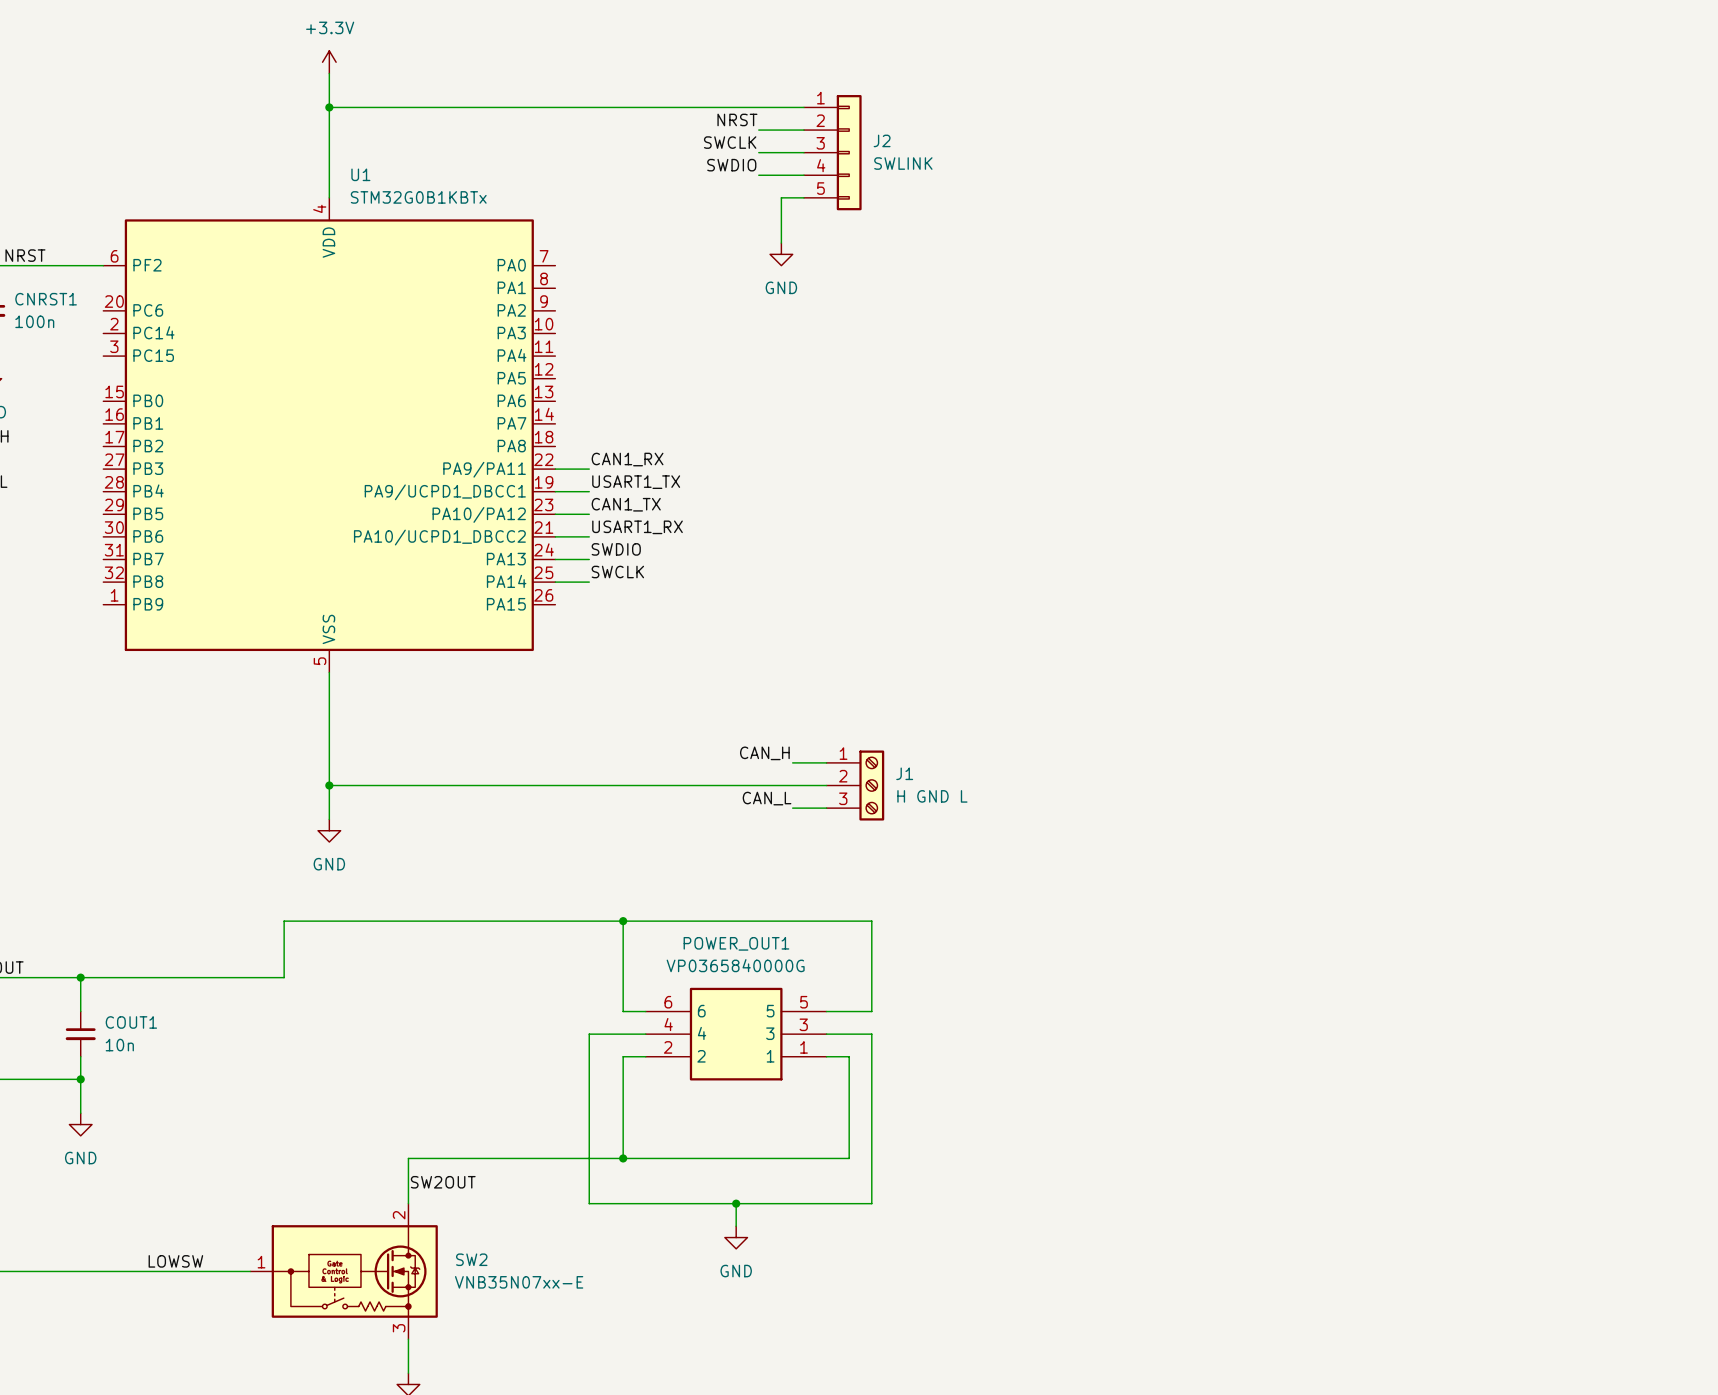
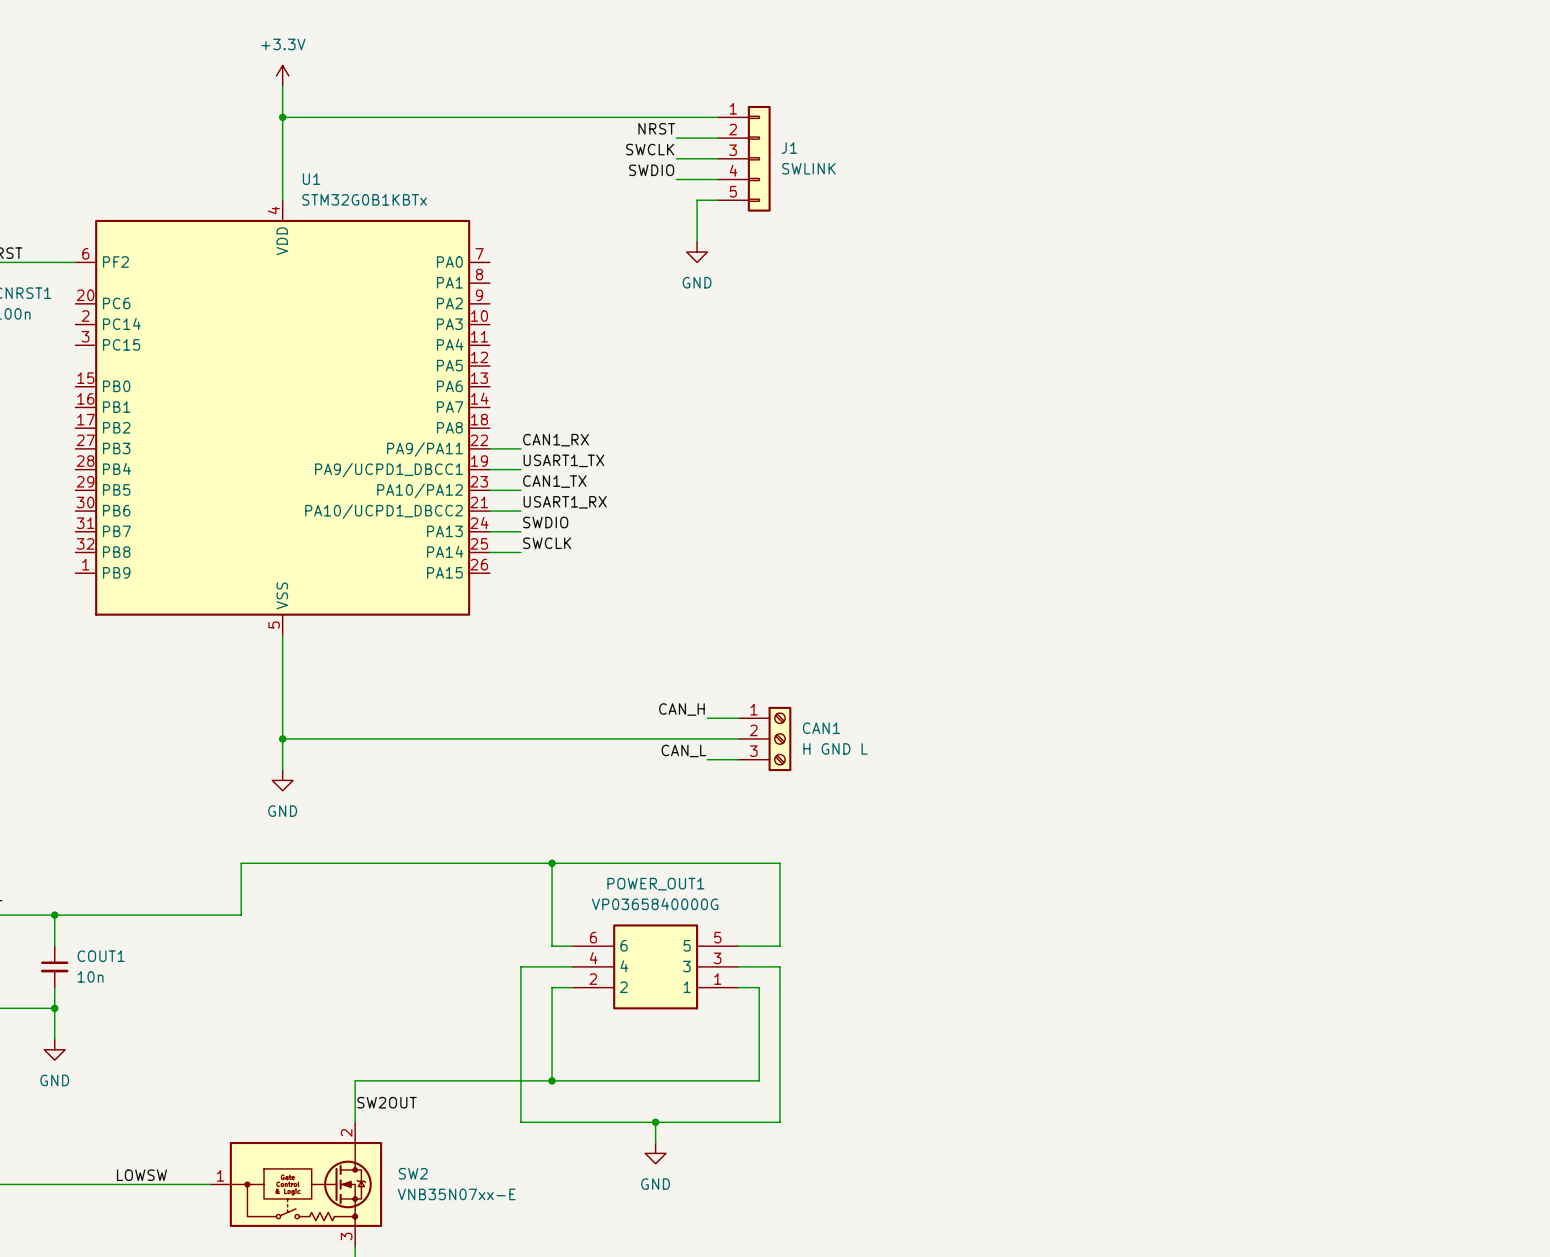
J2 name: J2 (882, 140) -> J1 (789, 148)
J1 name: J1 (904, 773) -> CAN1 (821, 728)

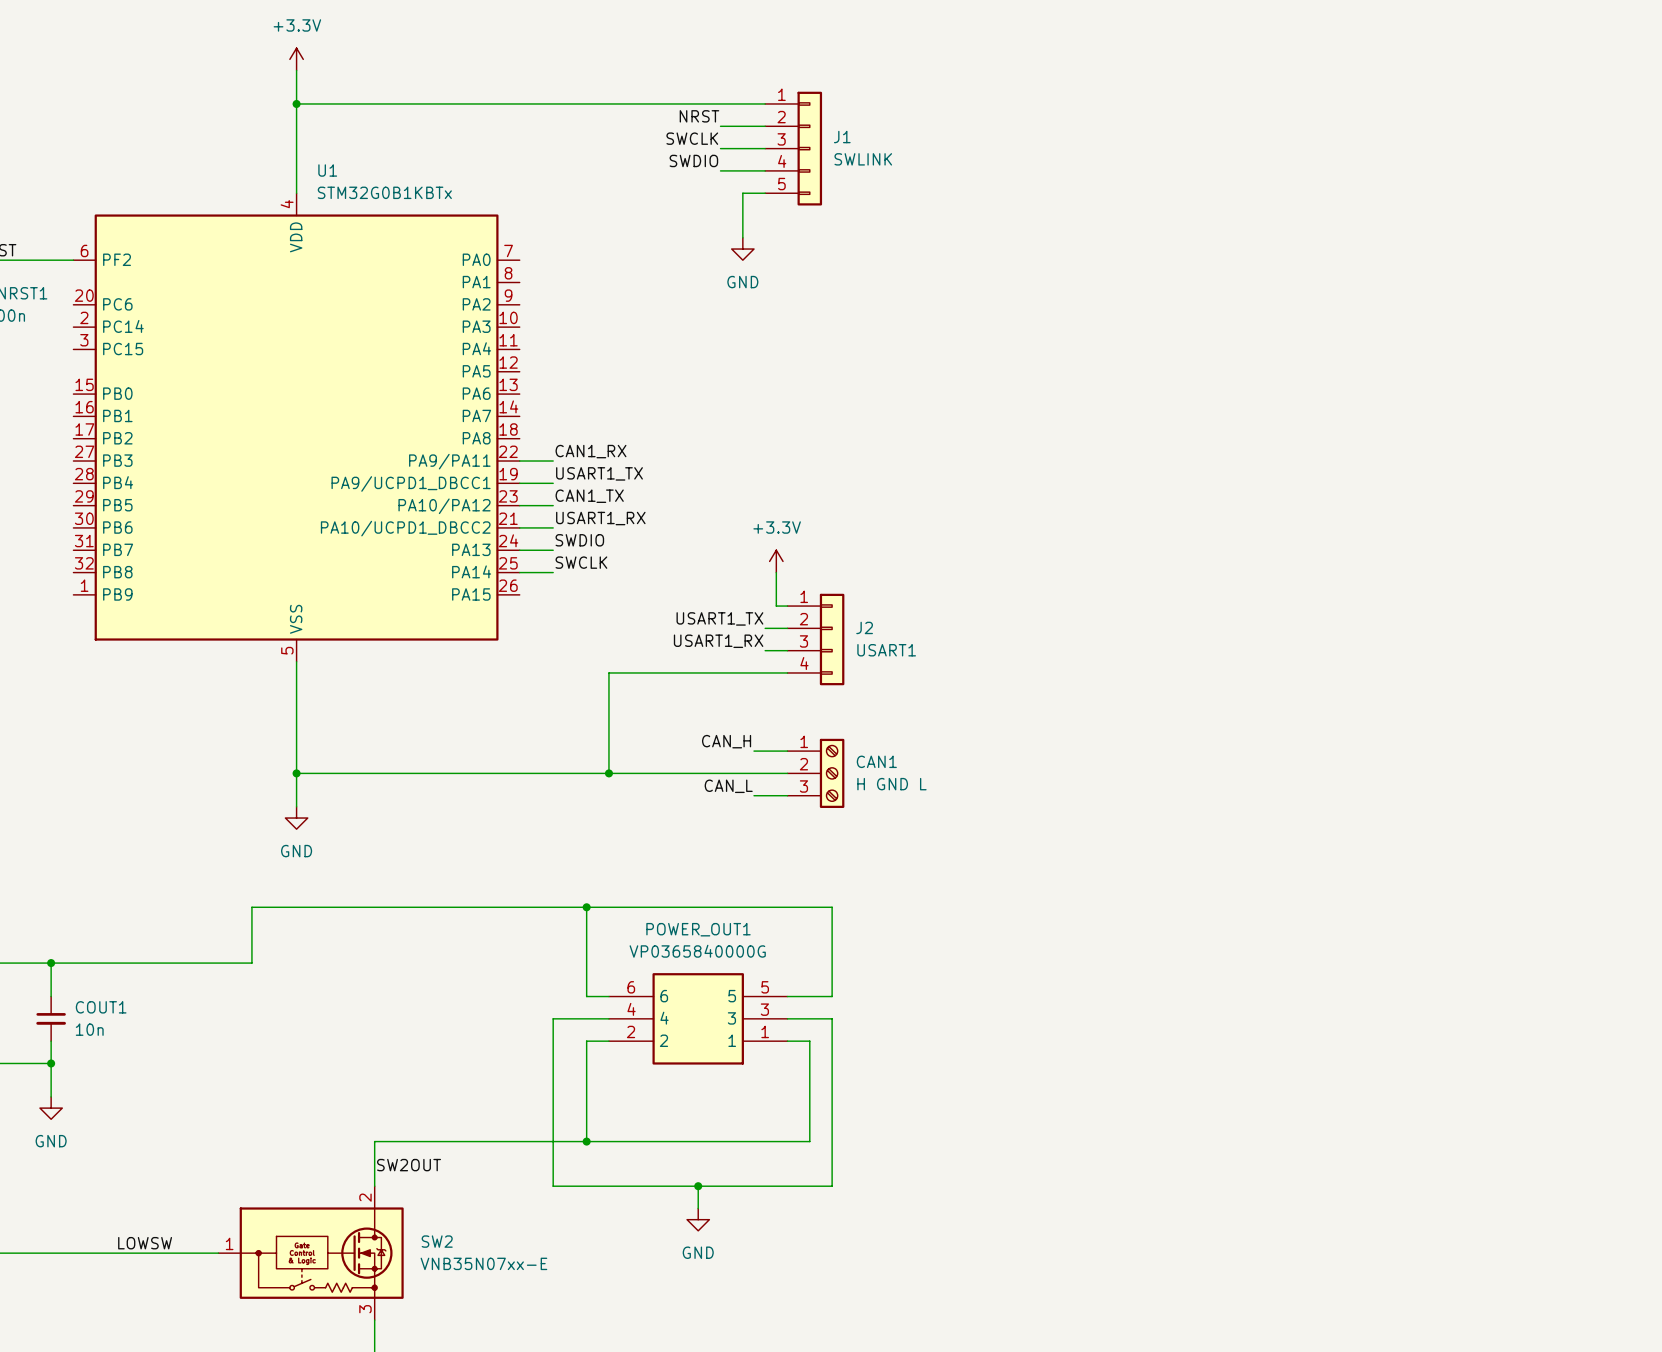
power symbol: none -> +3.3V (776, 561)
wire: none -> (776, 572) (776, 606) (787, 606)
label: none -> USART1_TX (719, 618)
wire: none -> (765, 628) (787, 628)
J2: none -> USART1 (815, 639)
label: none -> USART1_RX (718, 641)
wire: none -> (765, 650) (787, 650)
wire: none -> (787, 672) (608, 672) (608, 773)
junction: none -> (608, 773)

